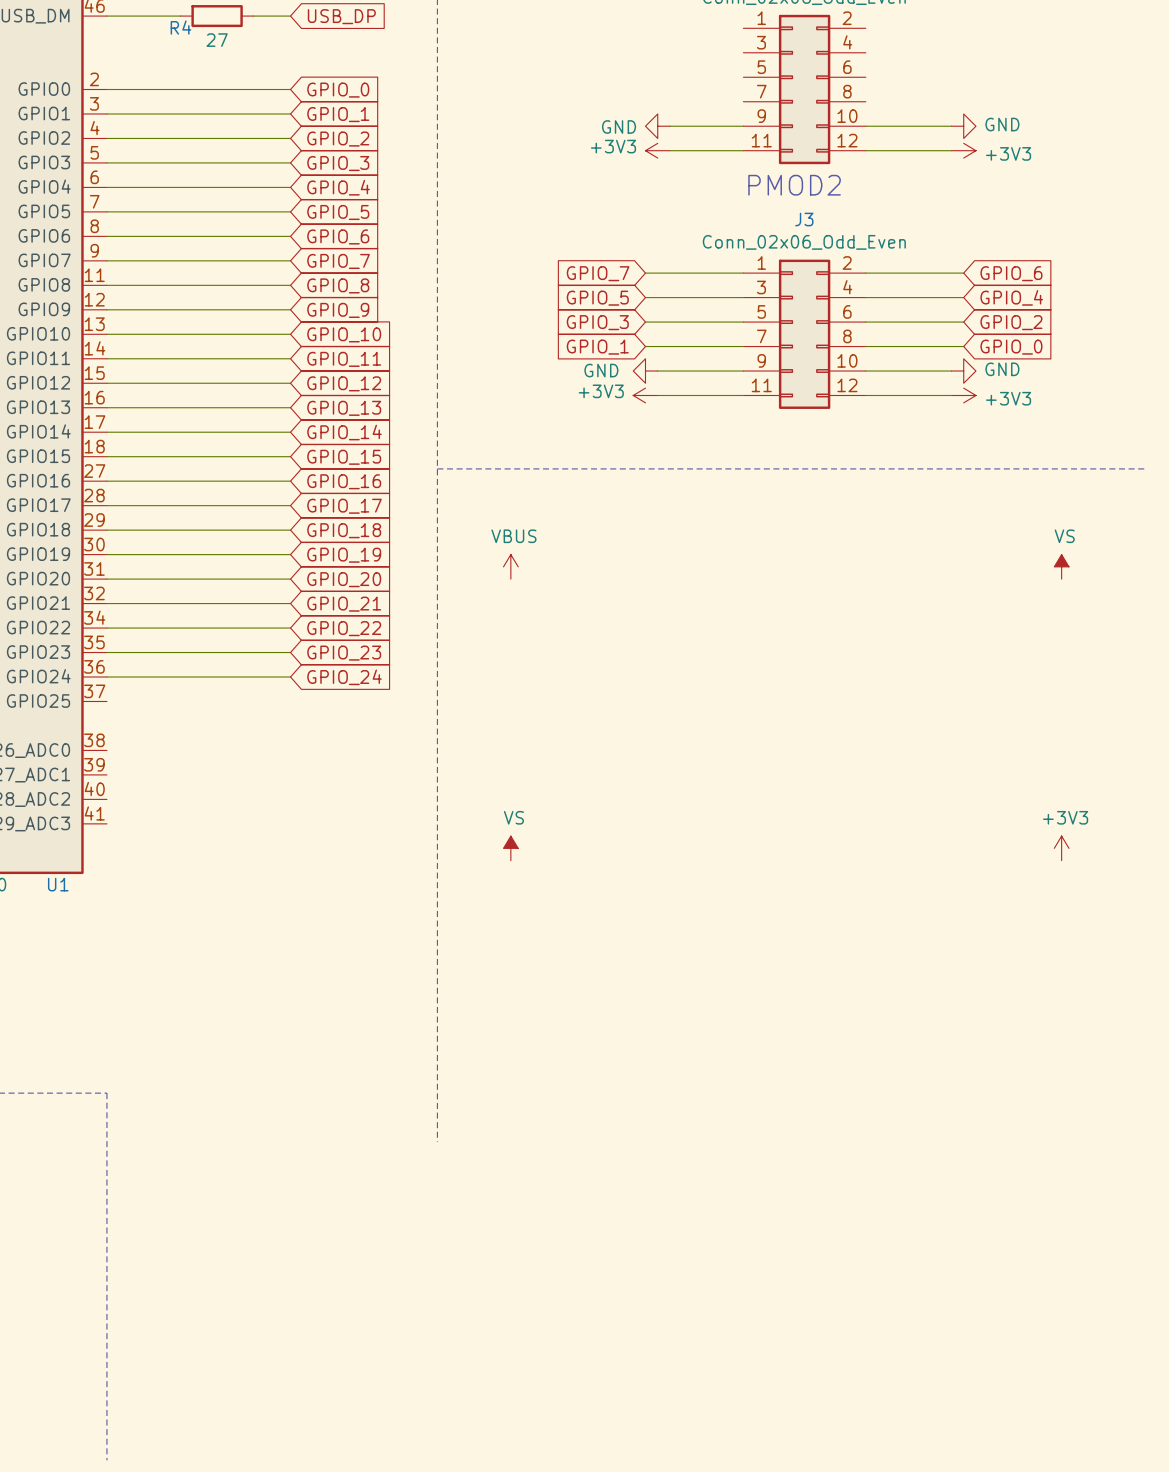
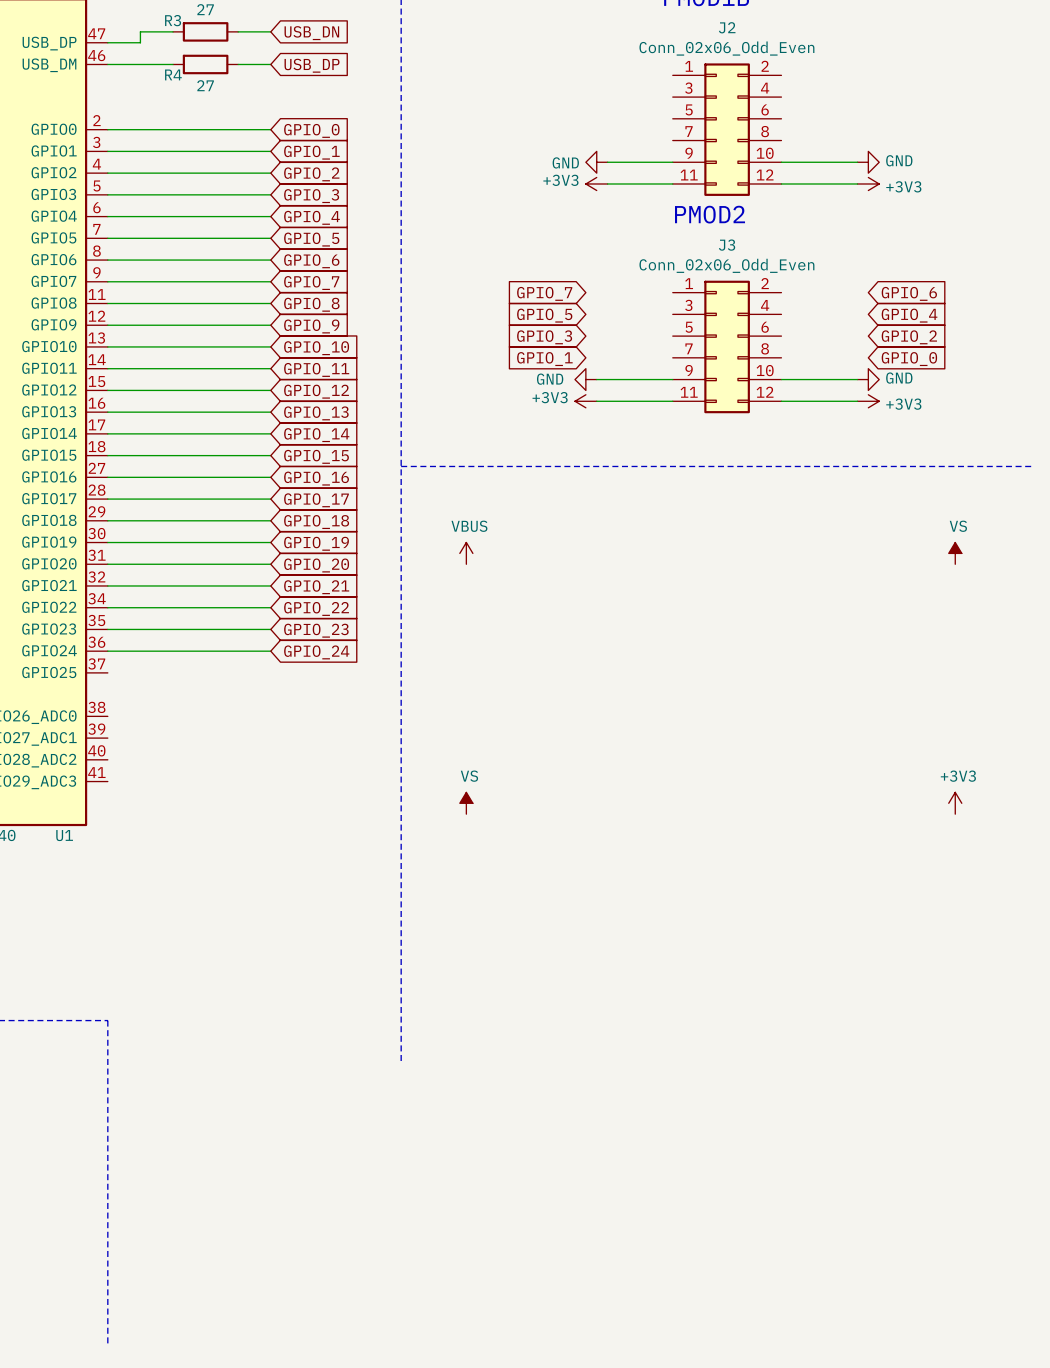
wire: (645, 273) (743, 273) -> none
wire: (865, 273) (963, 273) -> none
wire: (645, 297) (743, 297) -> none
wire: (865, 297) (963, 297) -> none
wire: (645, 322) (743, 322) -> none
wire: (865, 322) (963, 322) -> none
wire: (645, 346) (743, 346) -> none
wire: (865, 346) (963, 346) -> none

